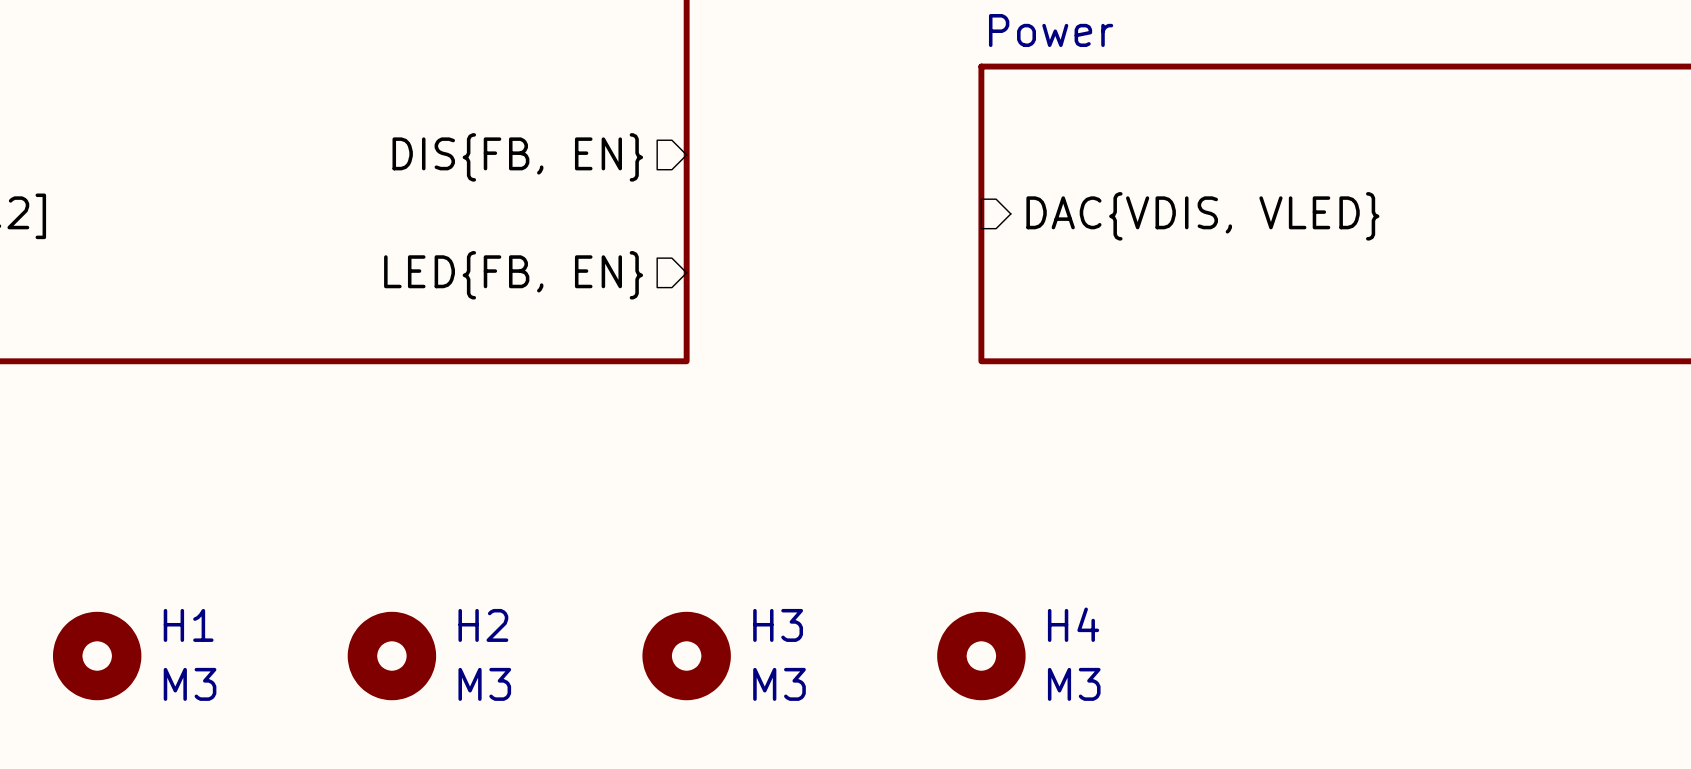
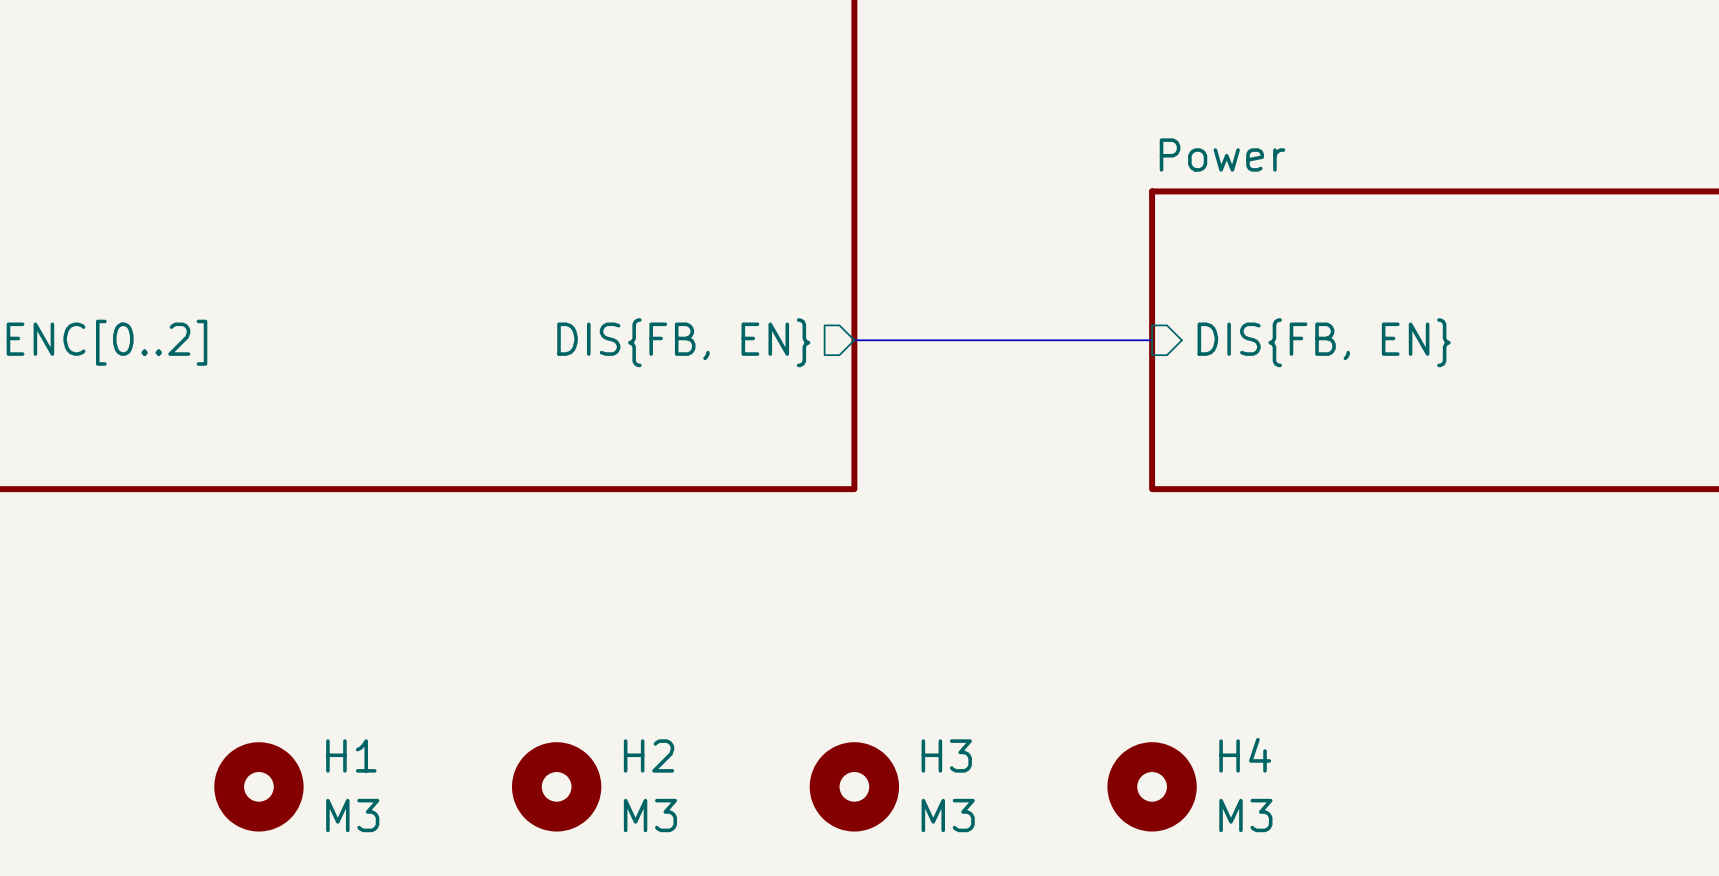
sheet pin position: DIS{FB, EN} (517, 157) -> DIS{FB, EN} (683, 342)
bus: none -> (854, 340) (1152, 340)
sheet pin: DAC{VDIS, VLED} (1202, 216) -> DIS{FB, EN} (1324, 342)
sheet pin: LED{FB, EN} (513, 275) -> none

